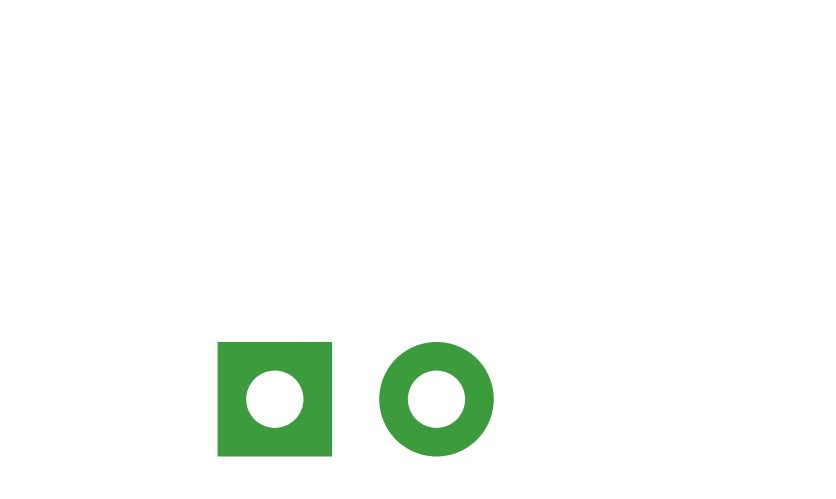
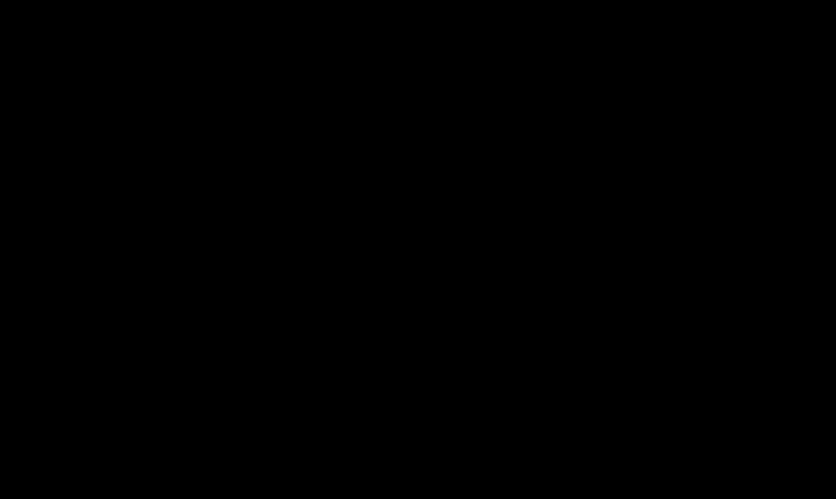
part: (355, 399) -> none

